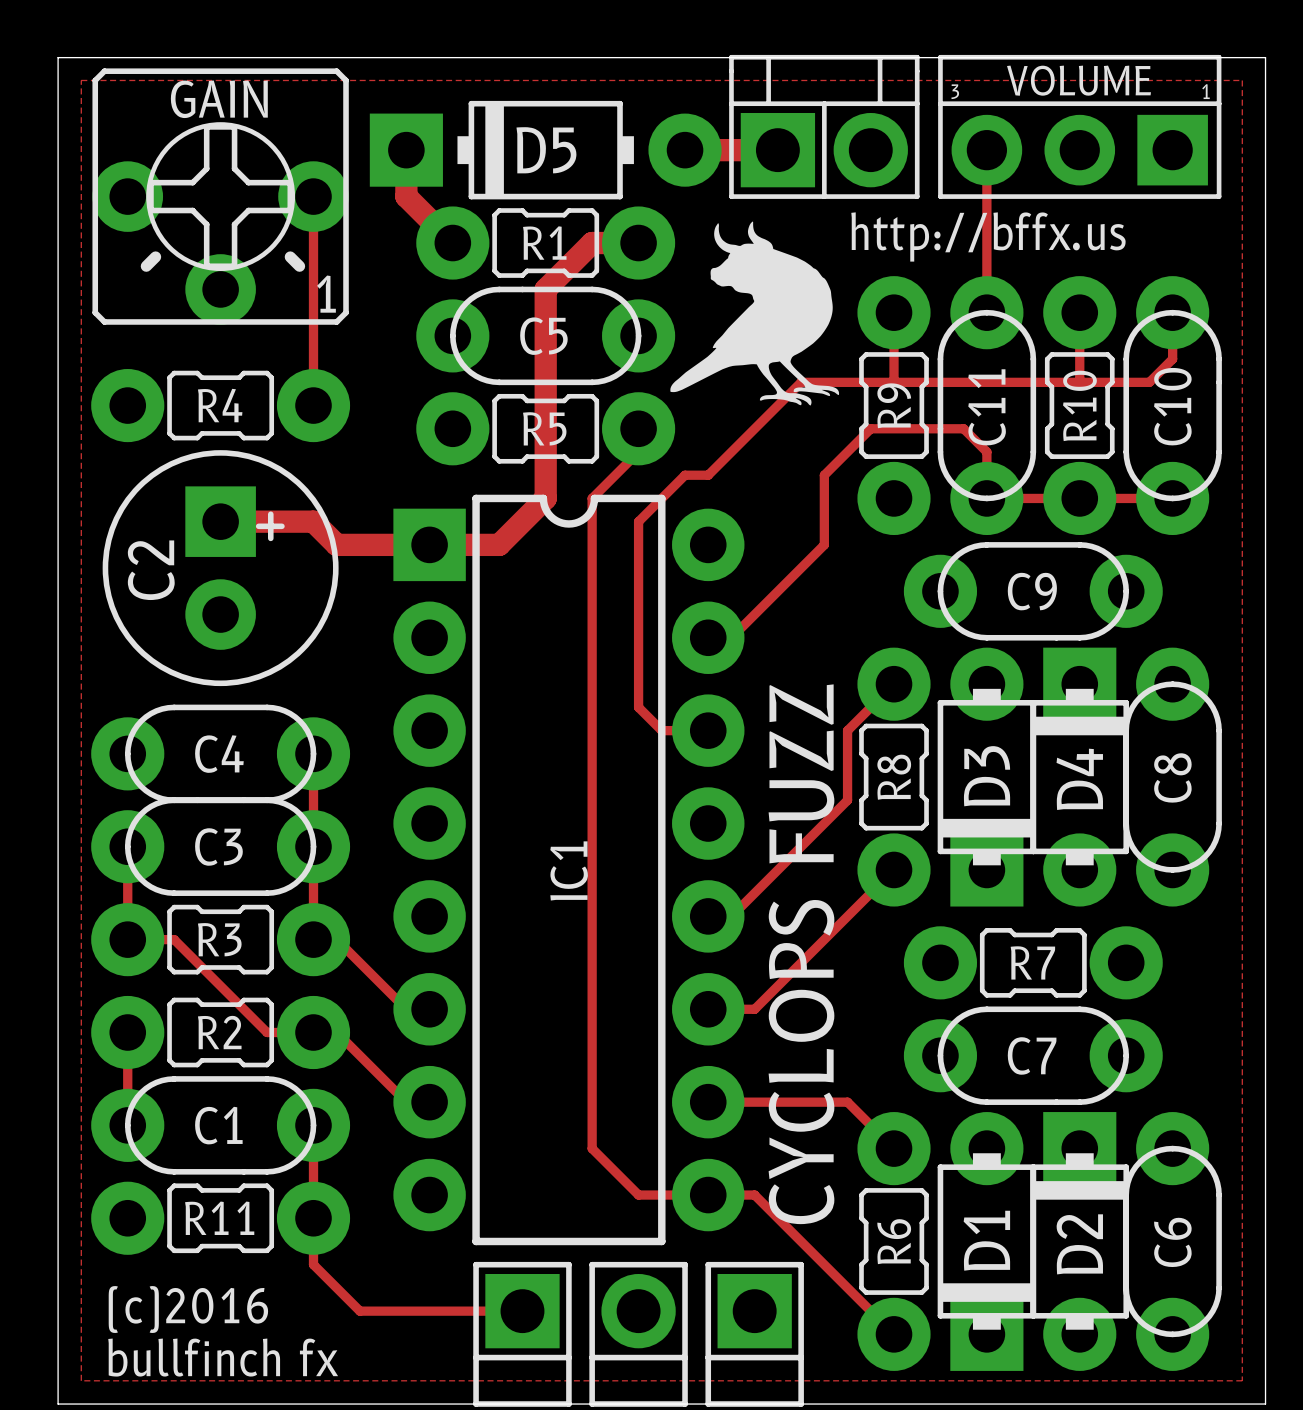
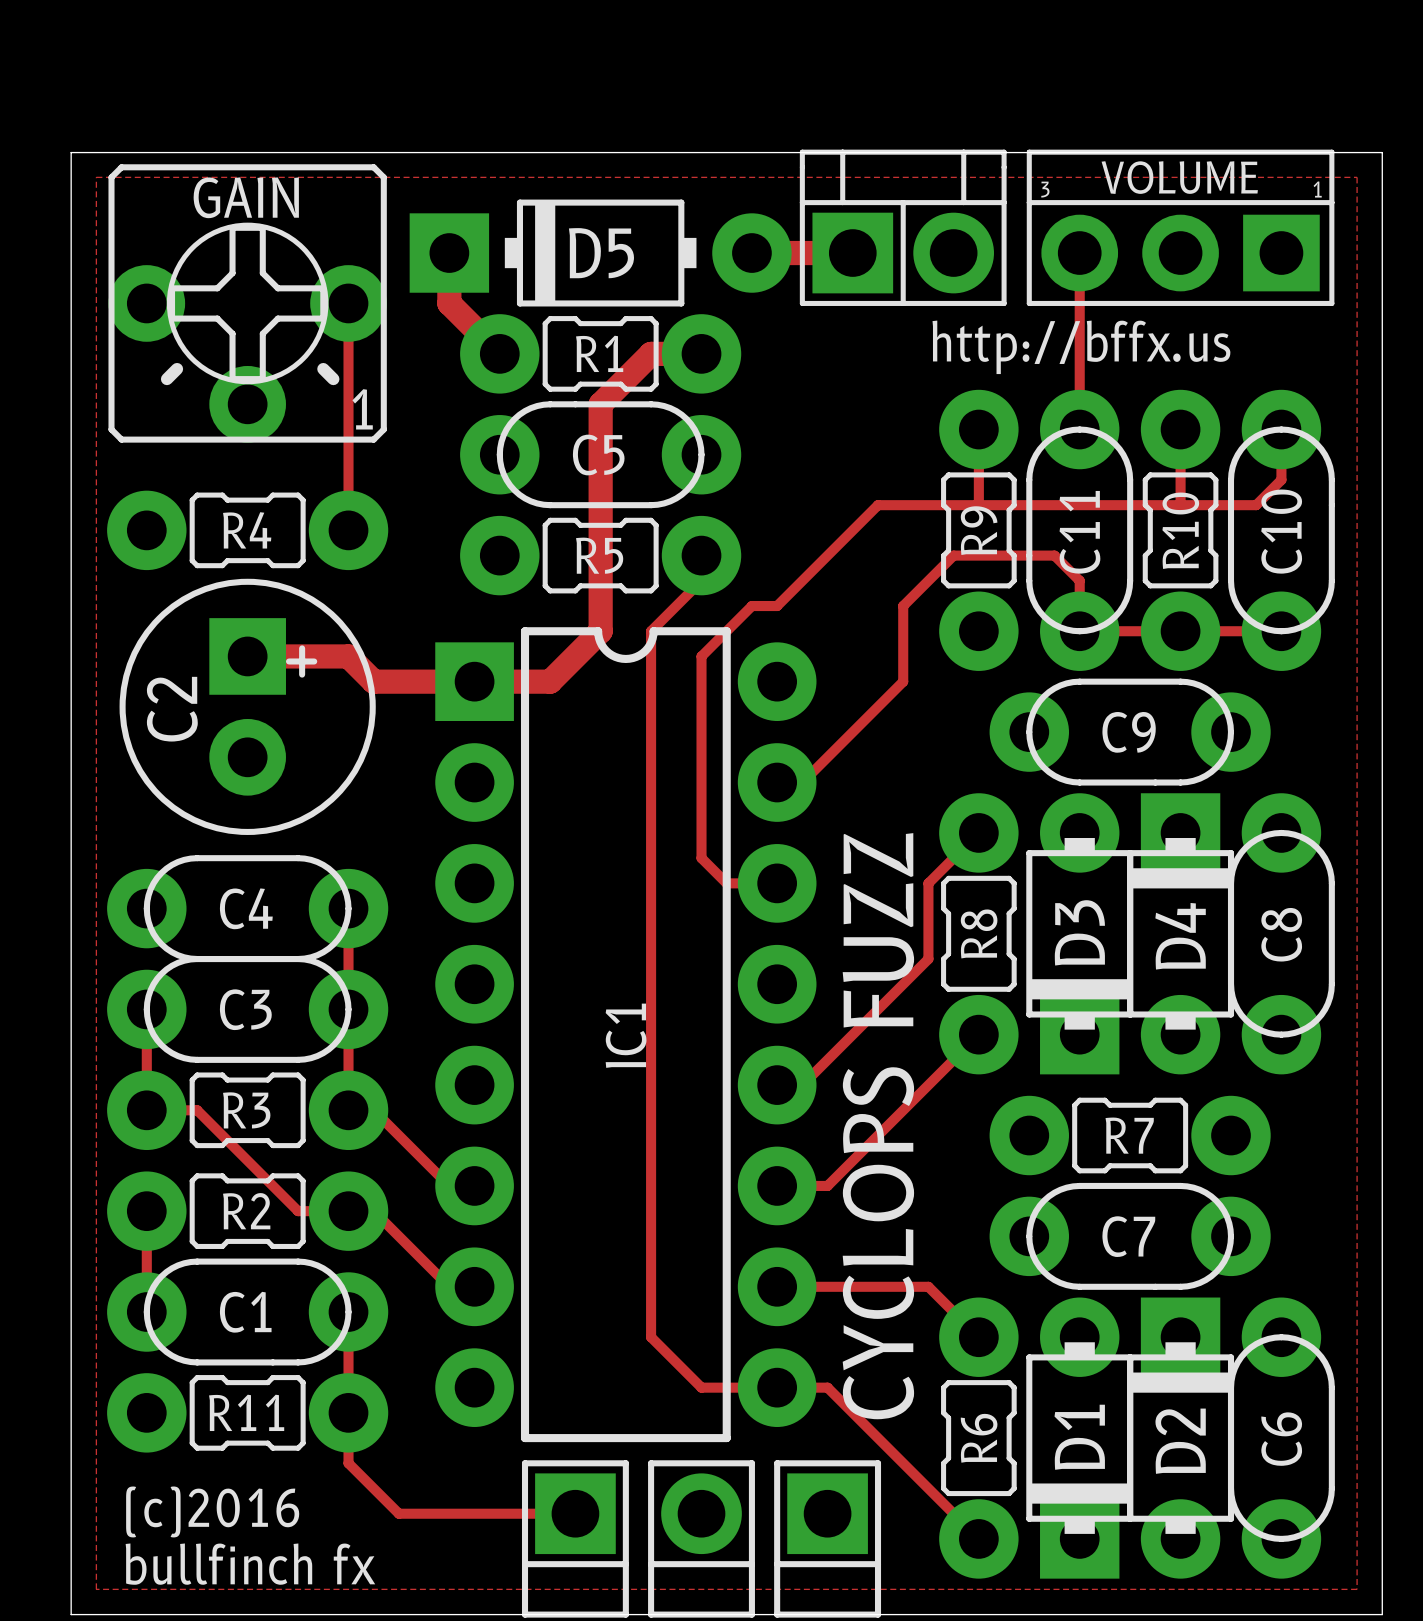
drawing: [670, 219, 840, 406] -> none

